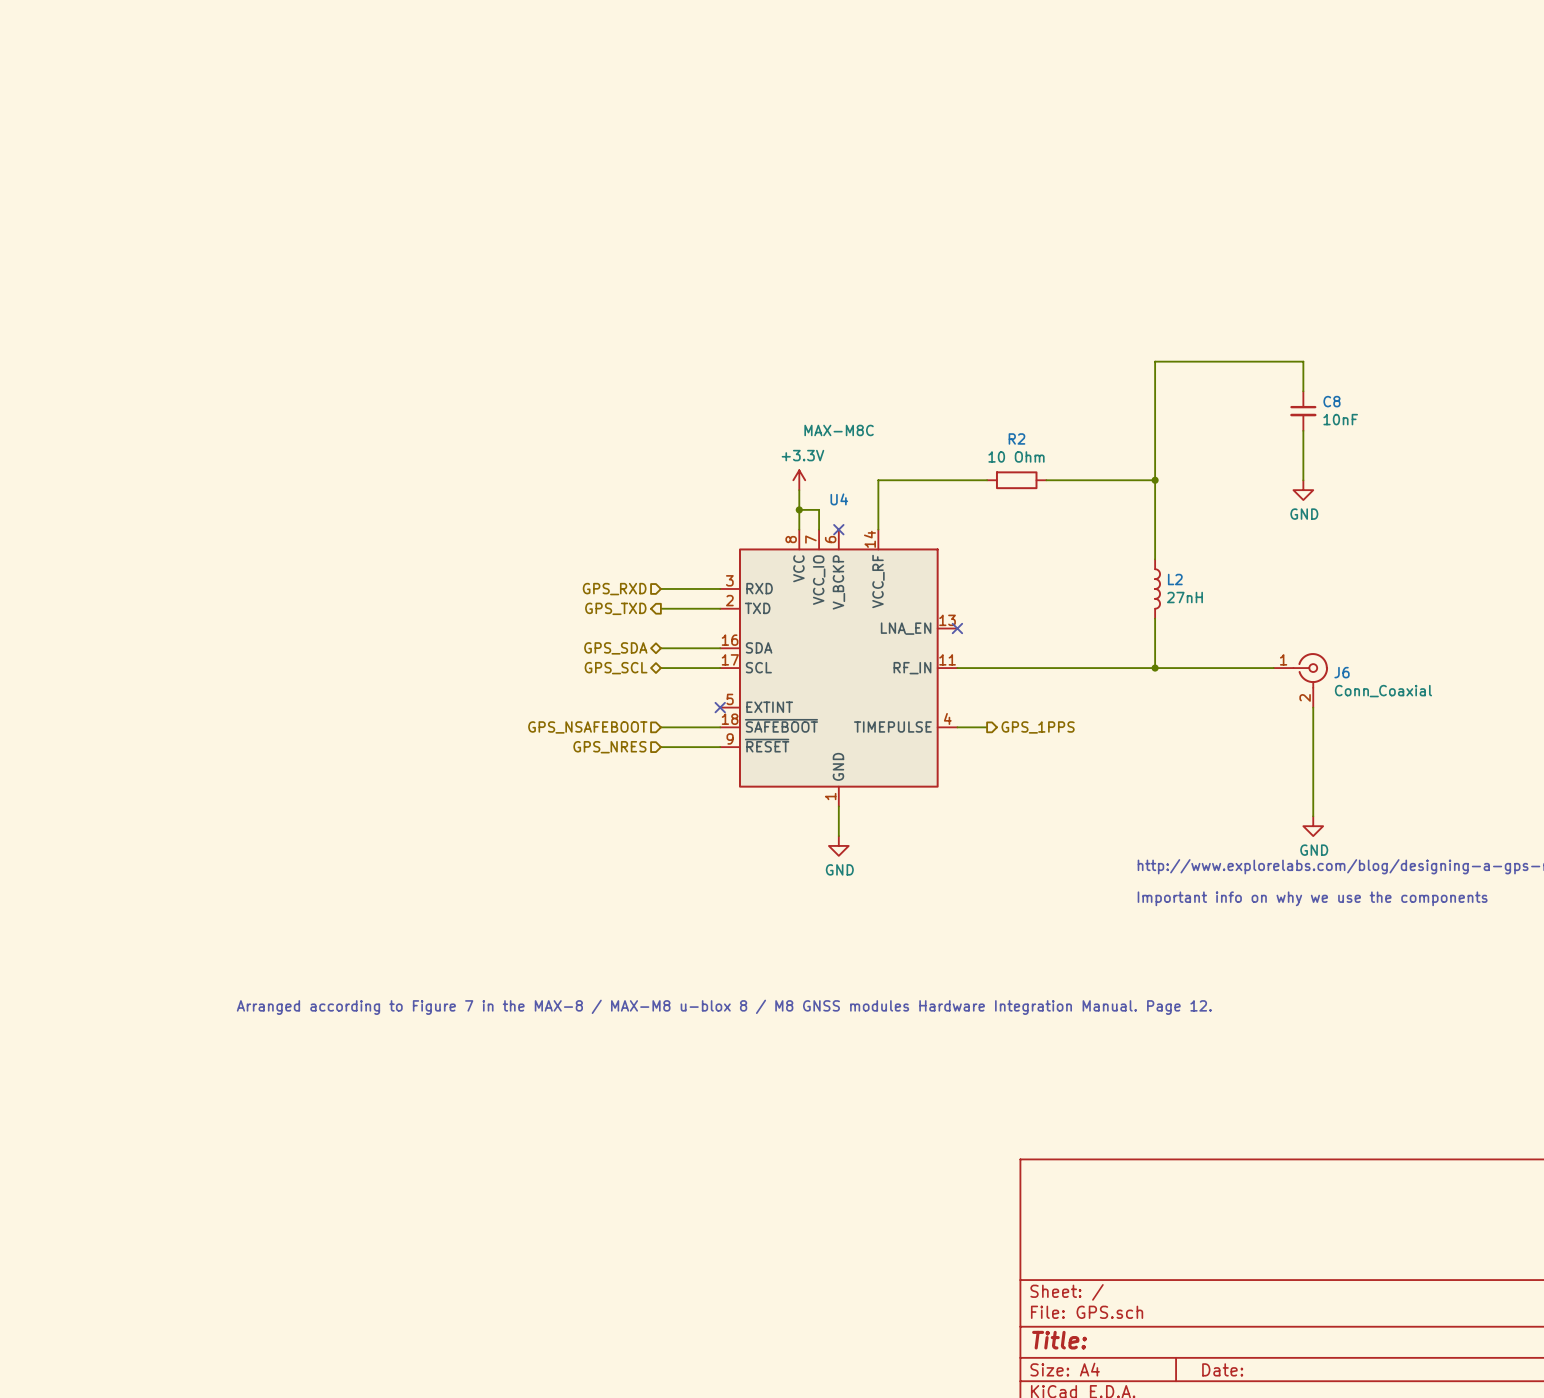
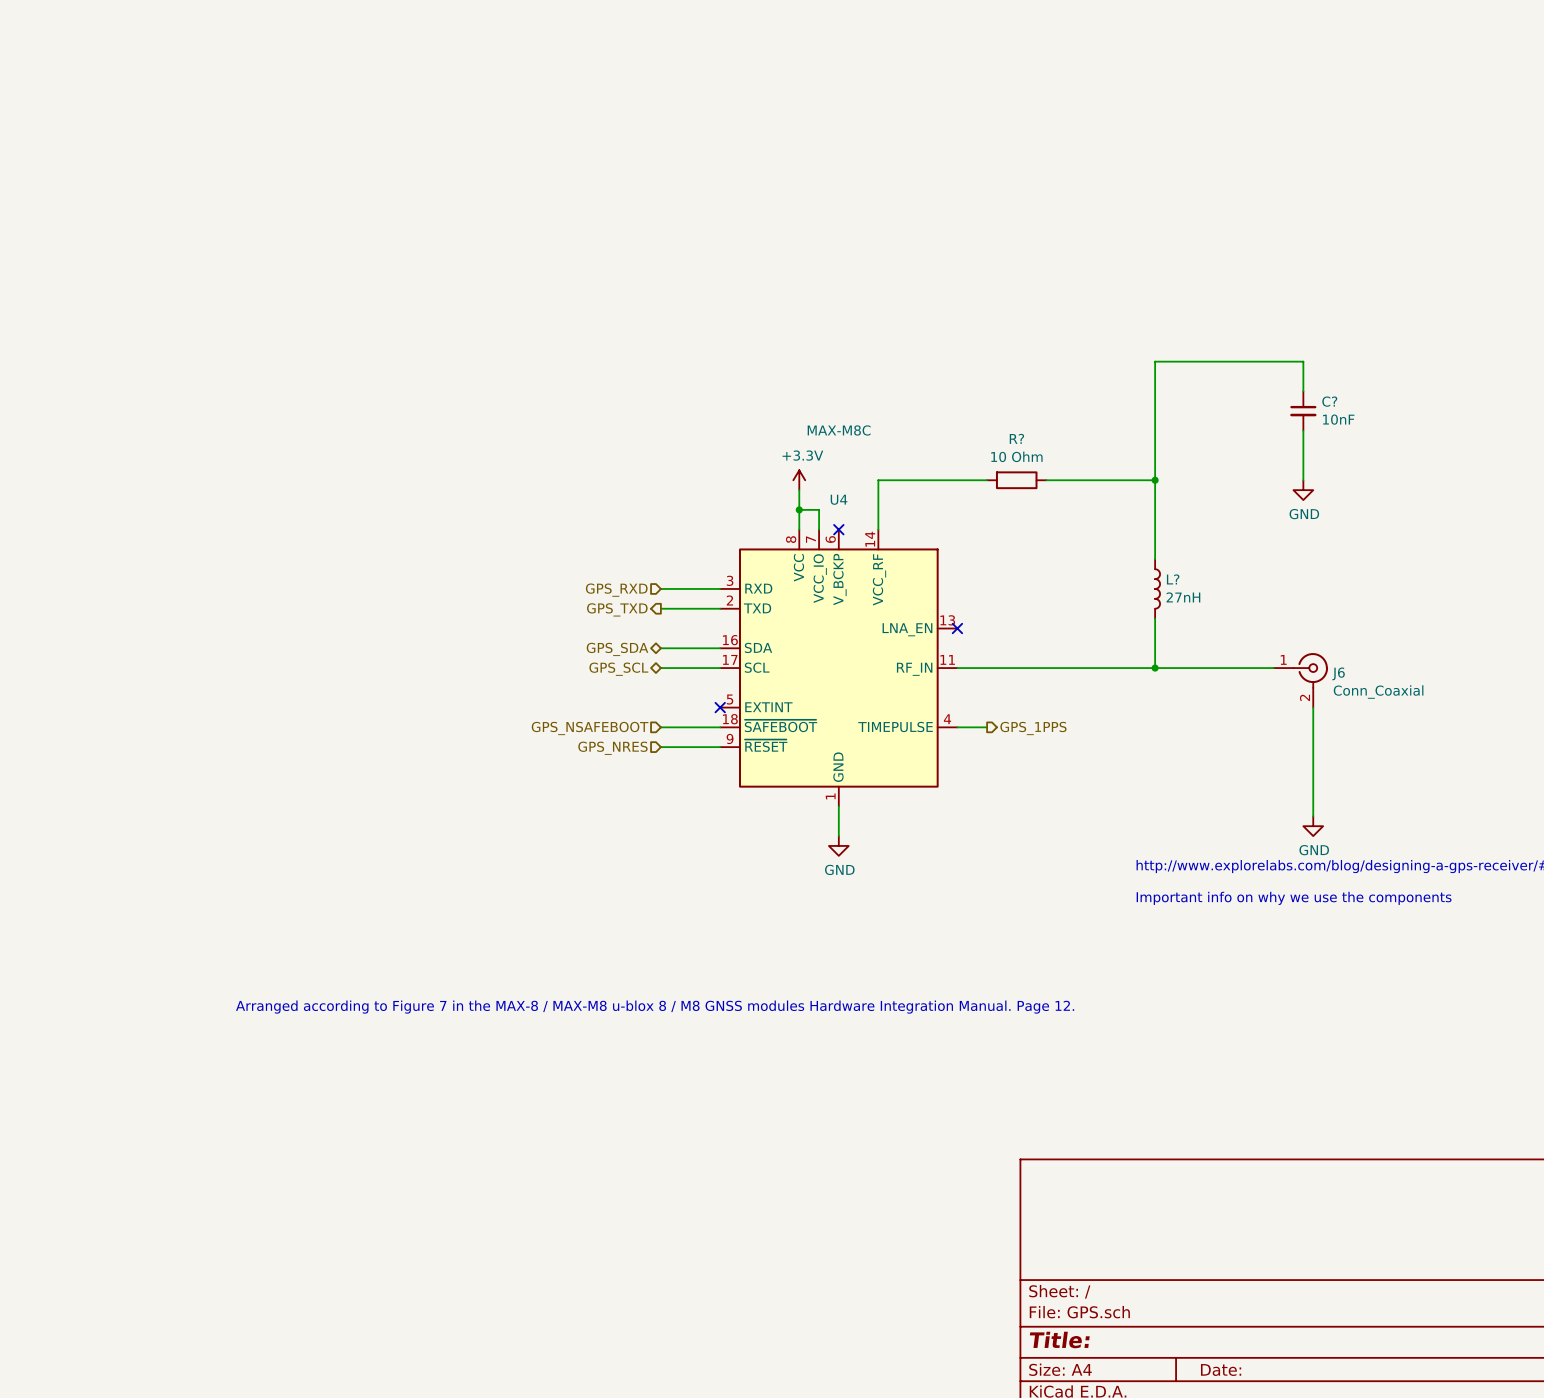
C8 name: C8 (1331, 401) -> C? (1329, 401)
R2 name: R2 (1016, 438) -> R? (1016, 438)
L2 name: L2 (1175, 579) -> L? (1173, 579)

